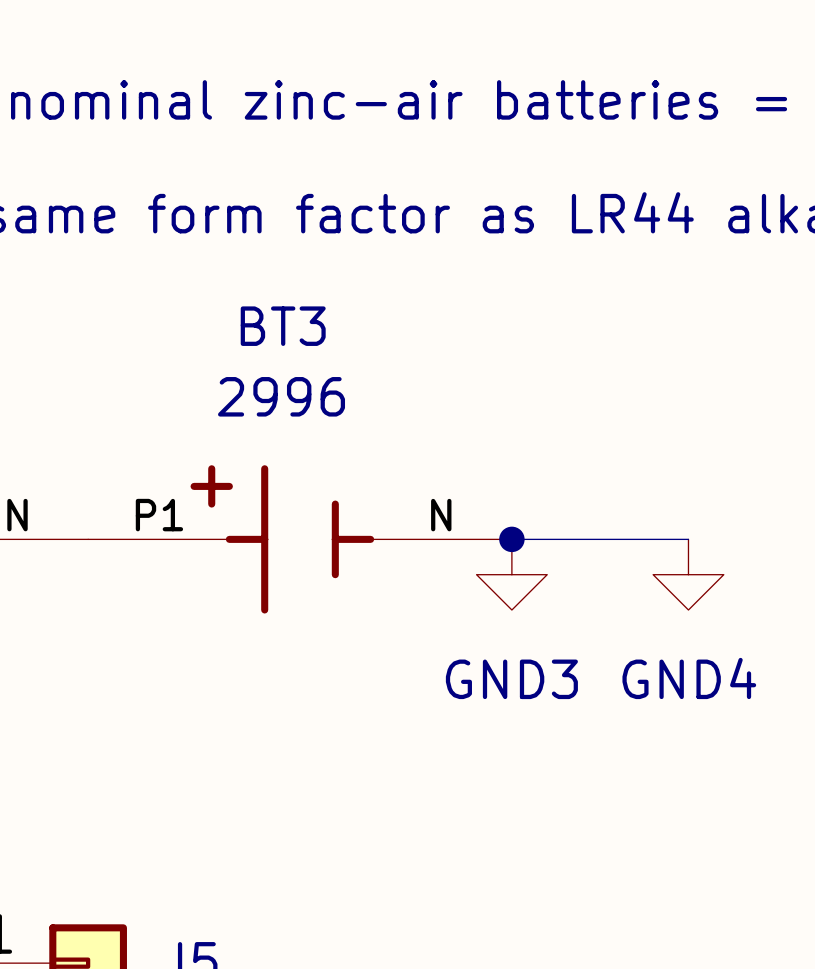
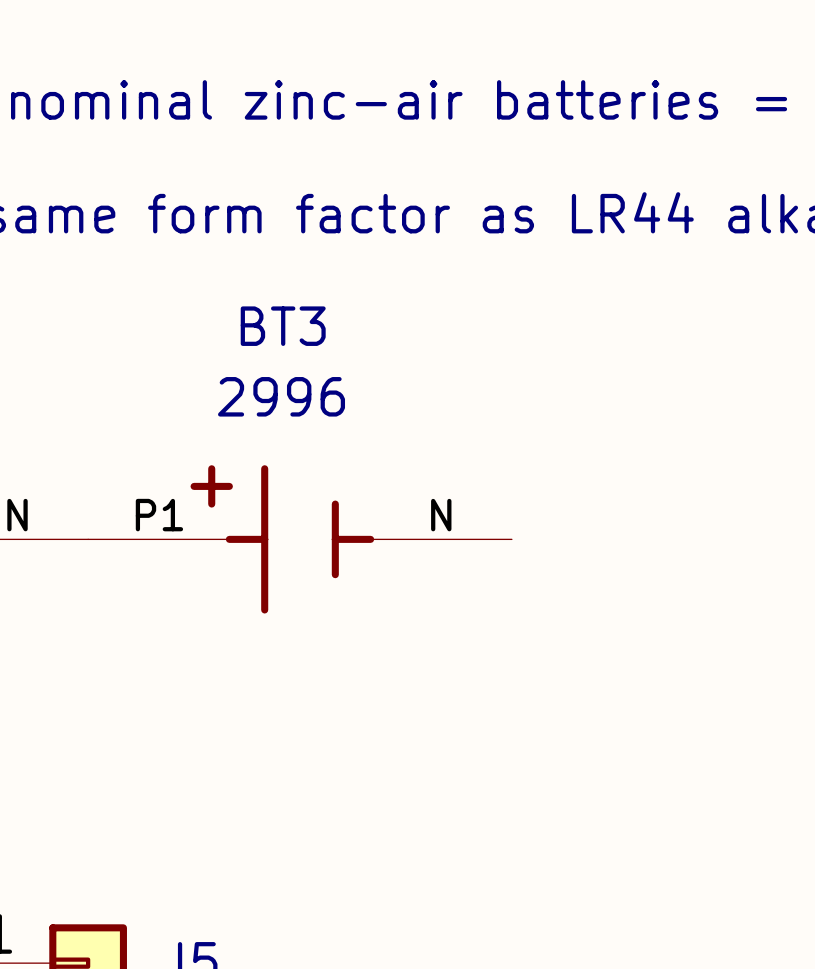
wire: (511, 539) (688, 539) -> none
junction: (511, 539) -> none
power symbol: GND3 (511, 574) -> none
power symbol: GND4 (688, 574) -> none

